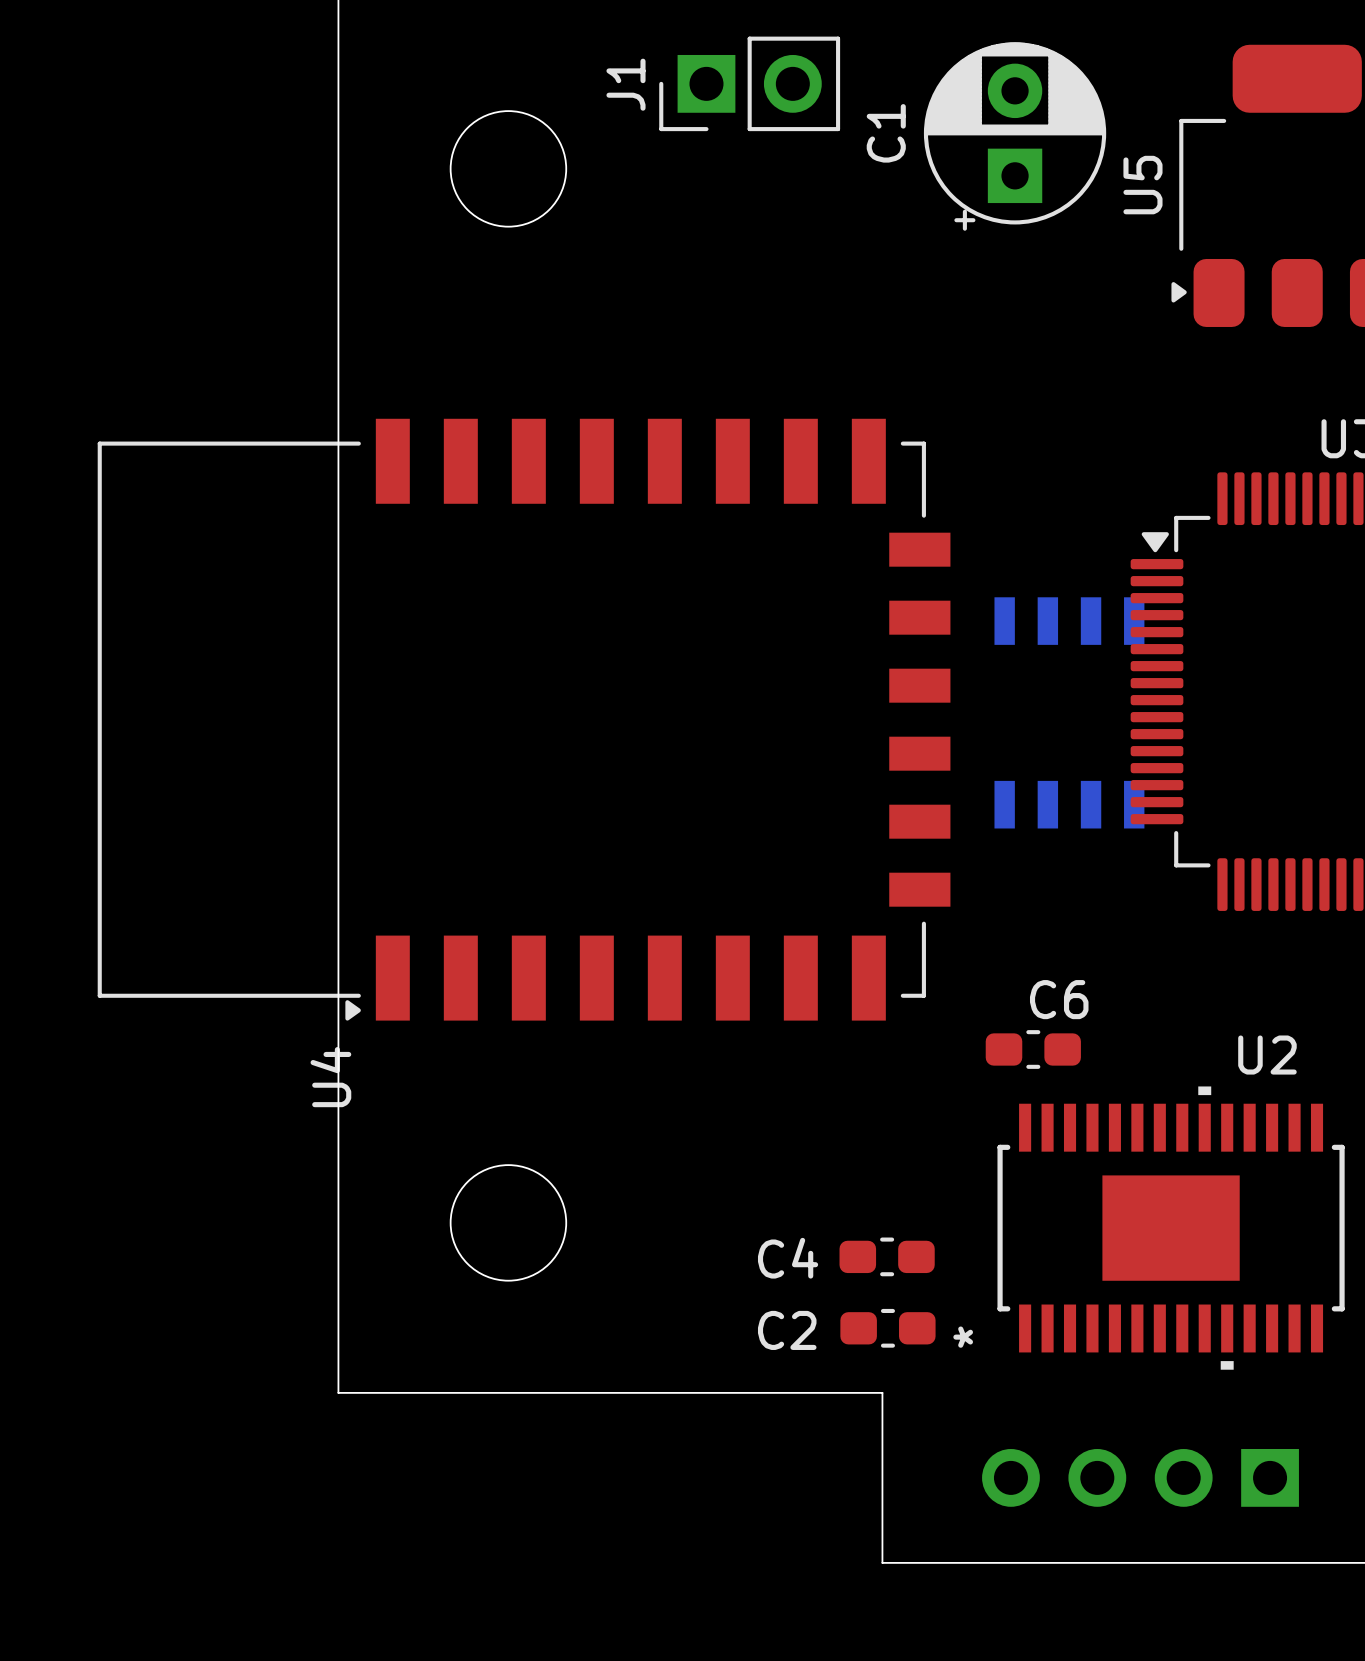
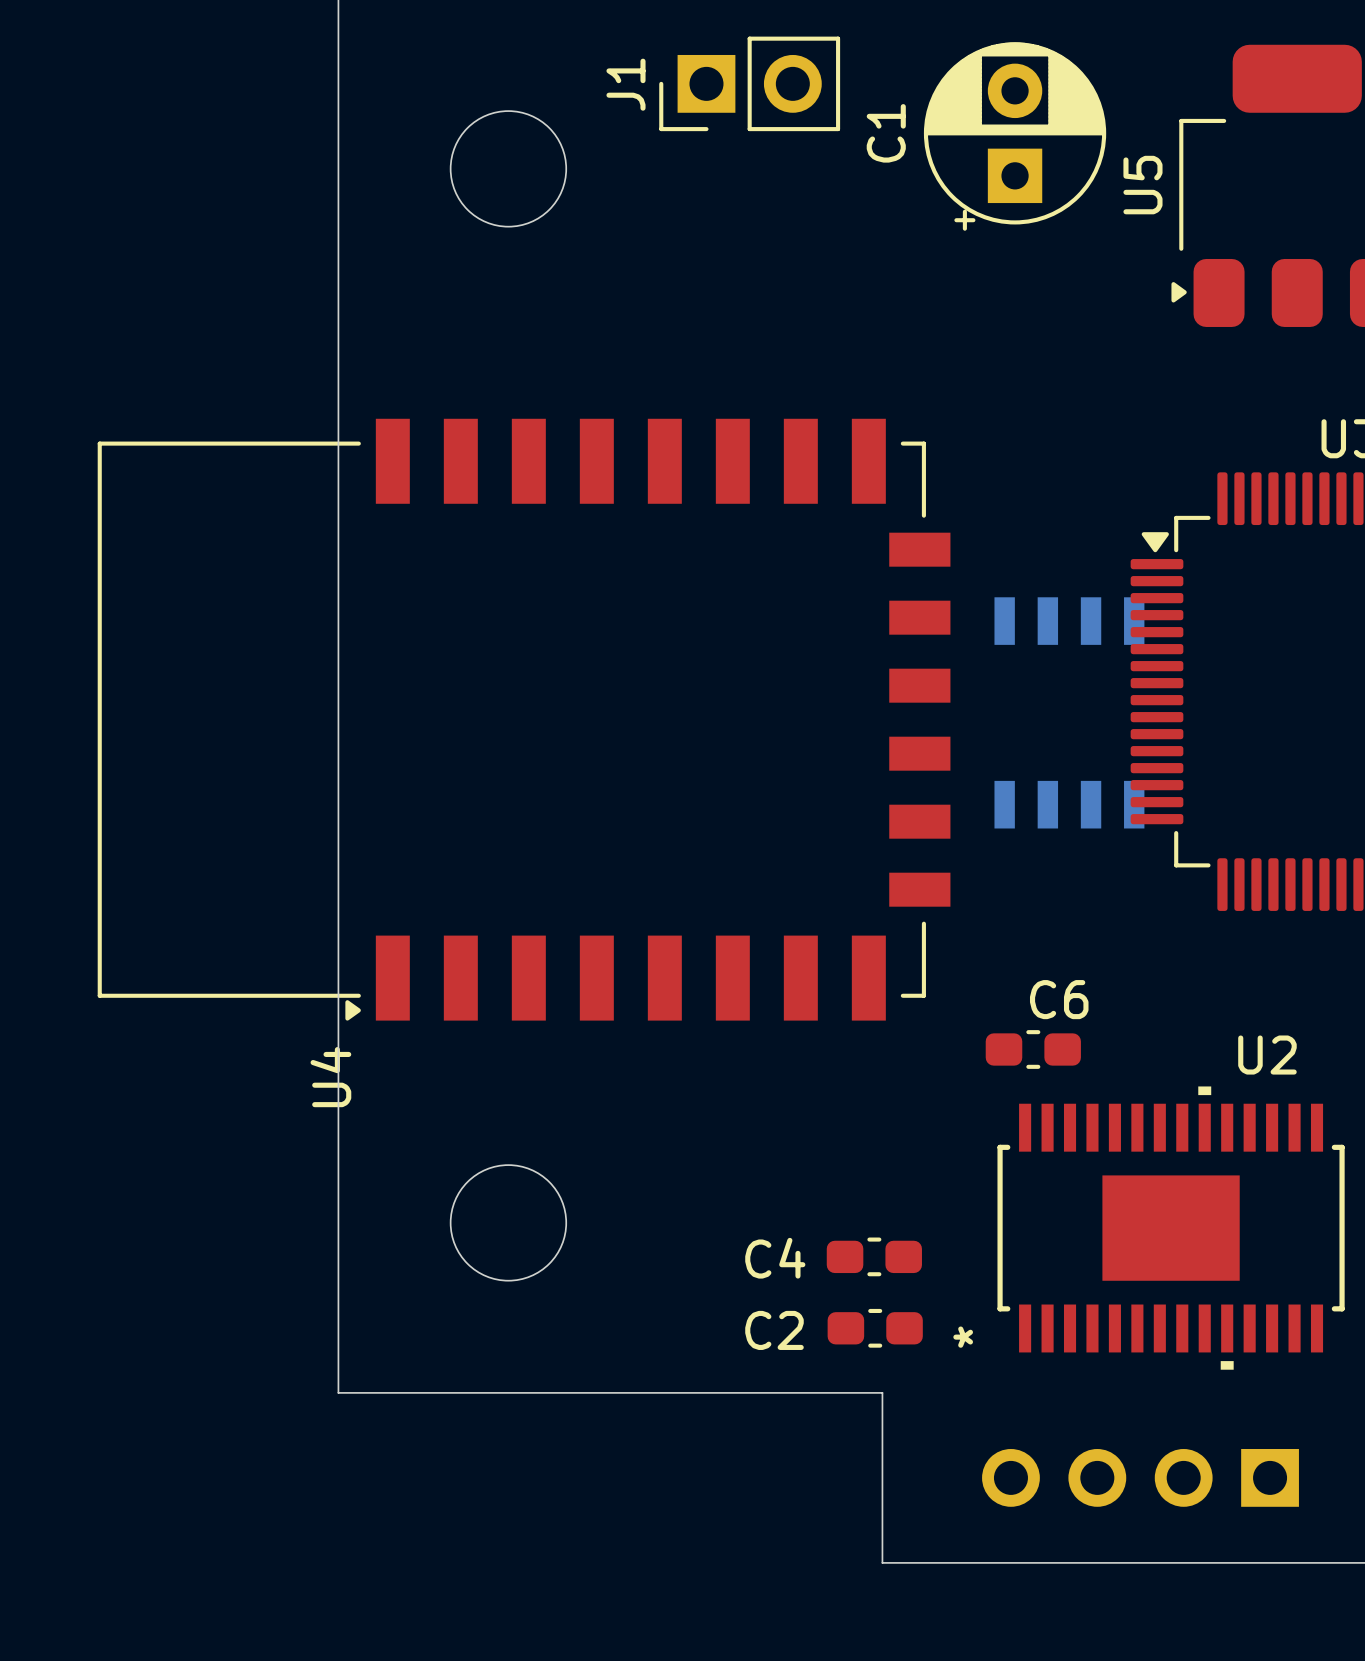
C4 position: (887, 1256) -> (874, 1256)
C2 position: (887, 1328) -> (875, 1328)

